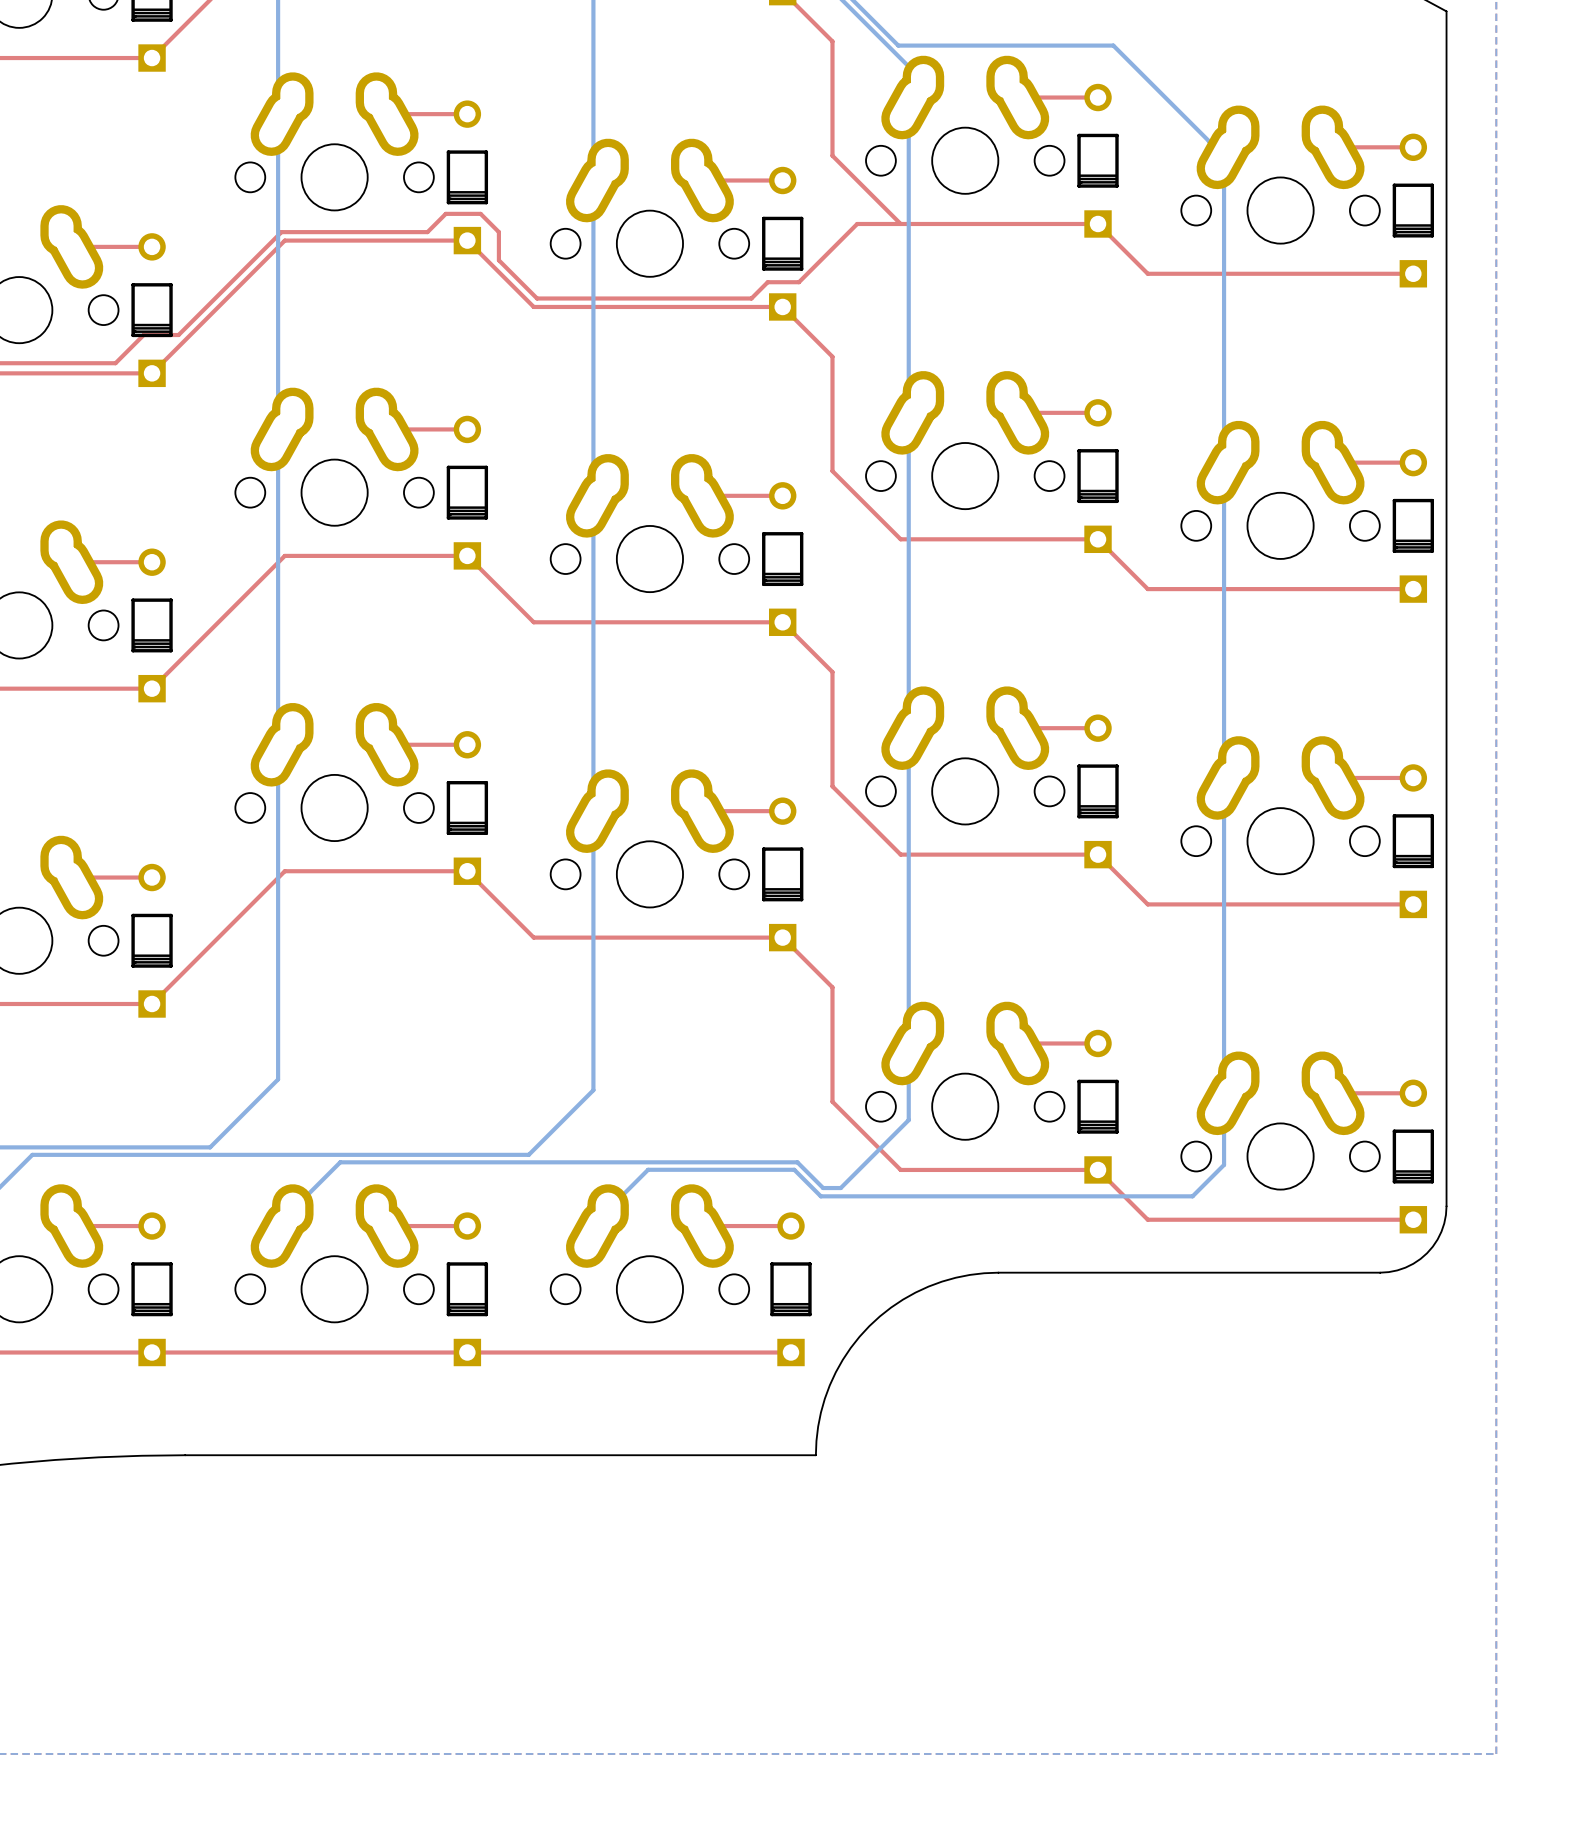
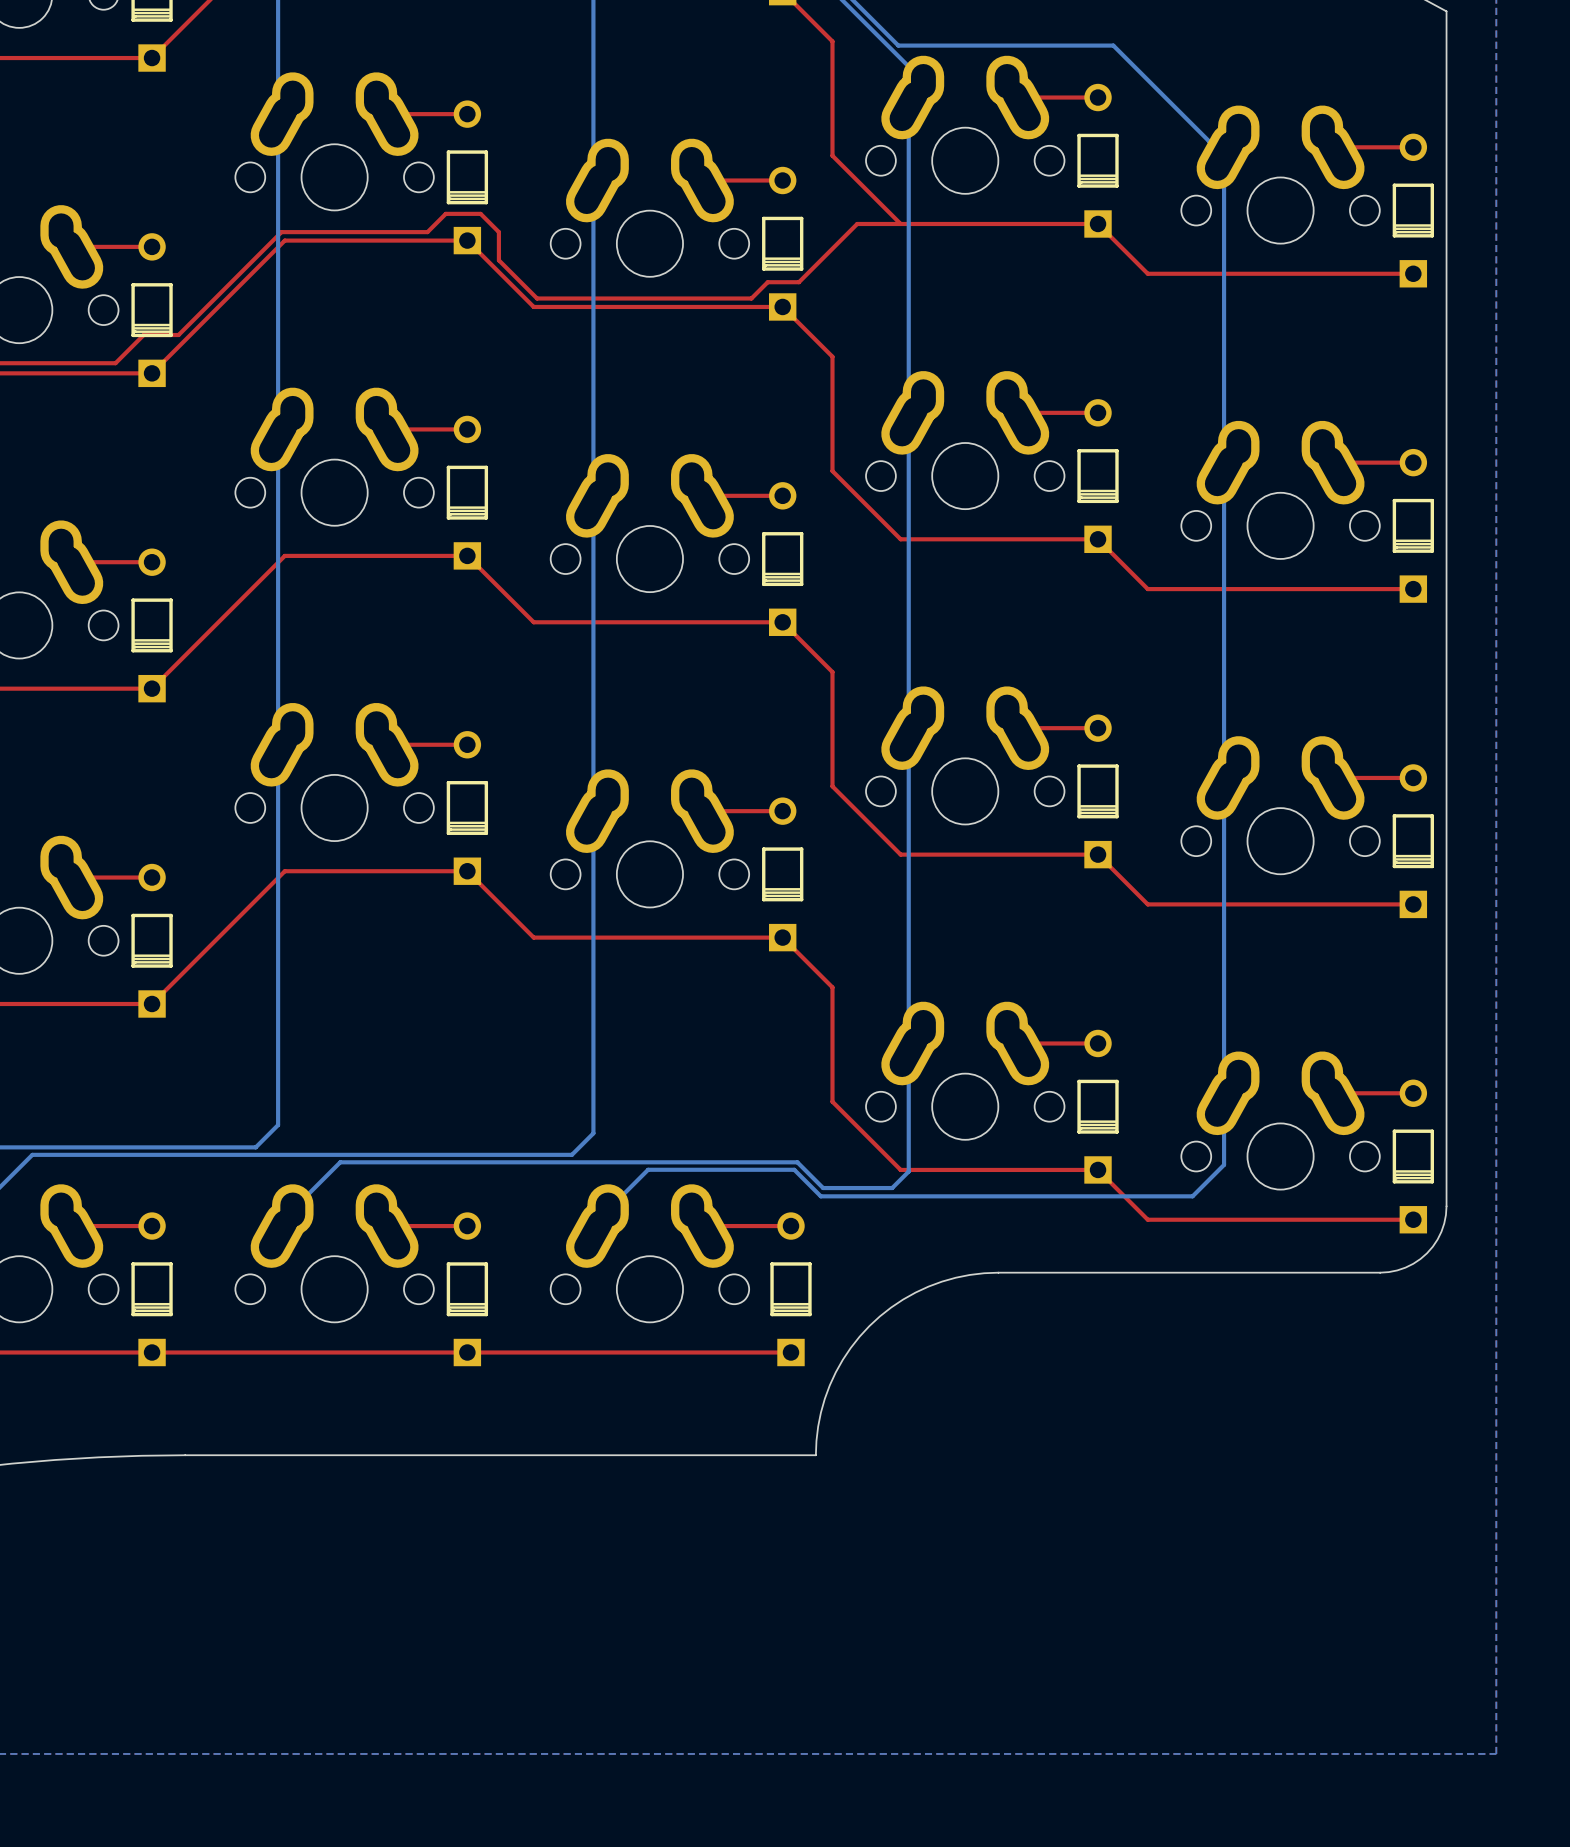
bottom track: (278, 1079) (210, 1147) -> (278, 1079) (278, 1125) (255, 1147) (210, 1147)
bottom track: (593, 1090) (528, 1154) -> (593, 1090) (593, 1133) (571, 1154) (528, 1154)
bottom track: (908, 1120) (840, 1188) -> (908, 1120) (908, 1171) (892, 1188) (840, 1188)

